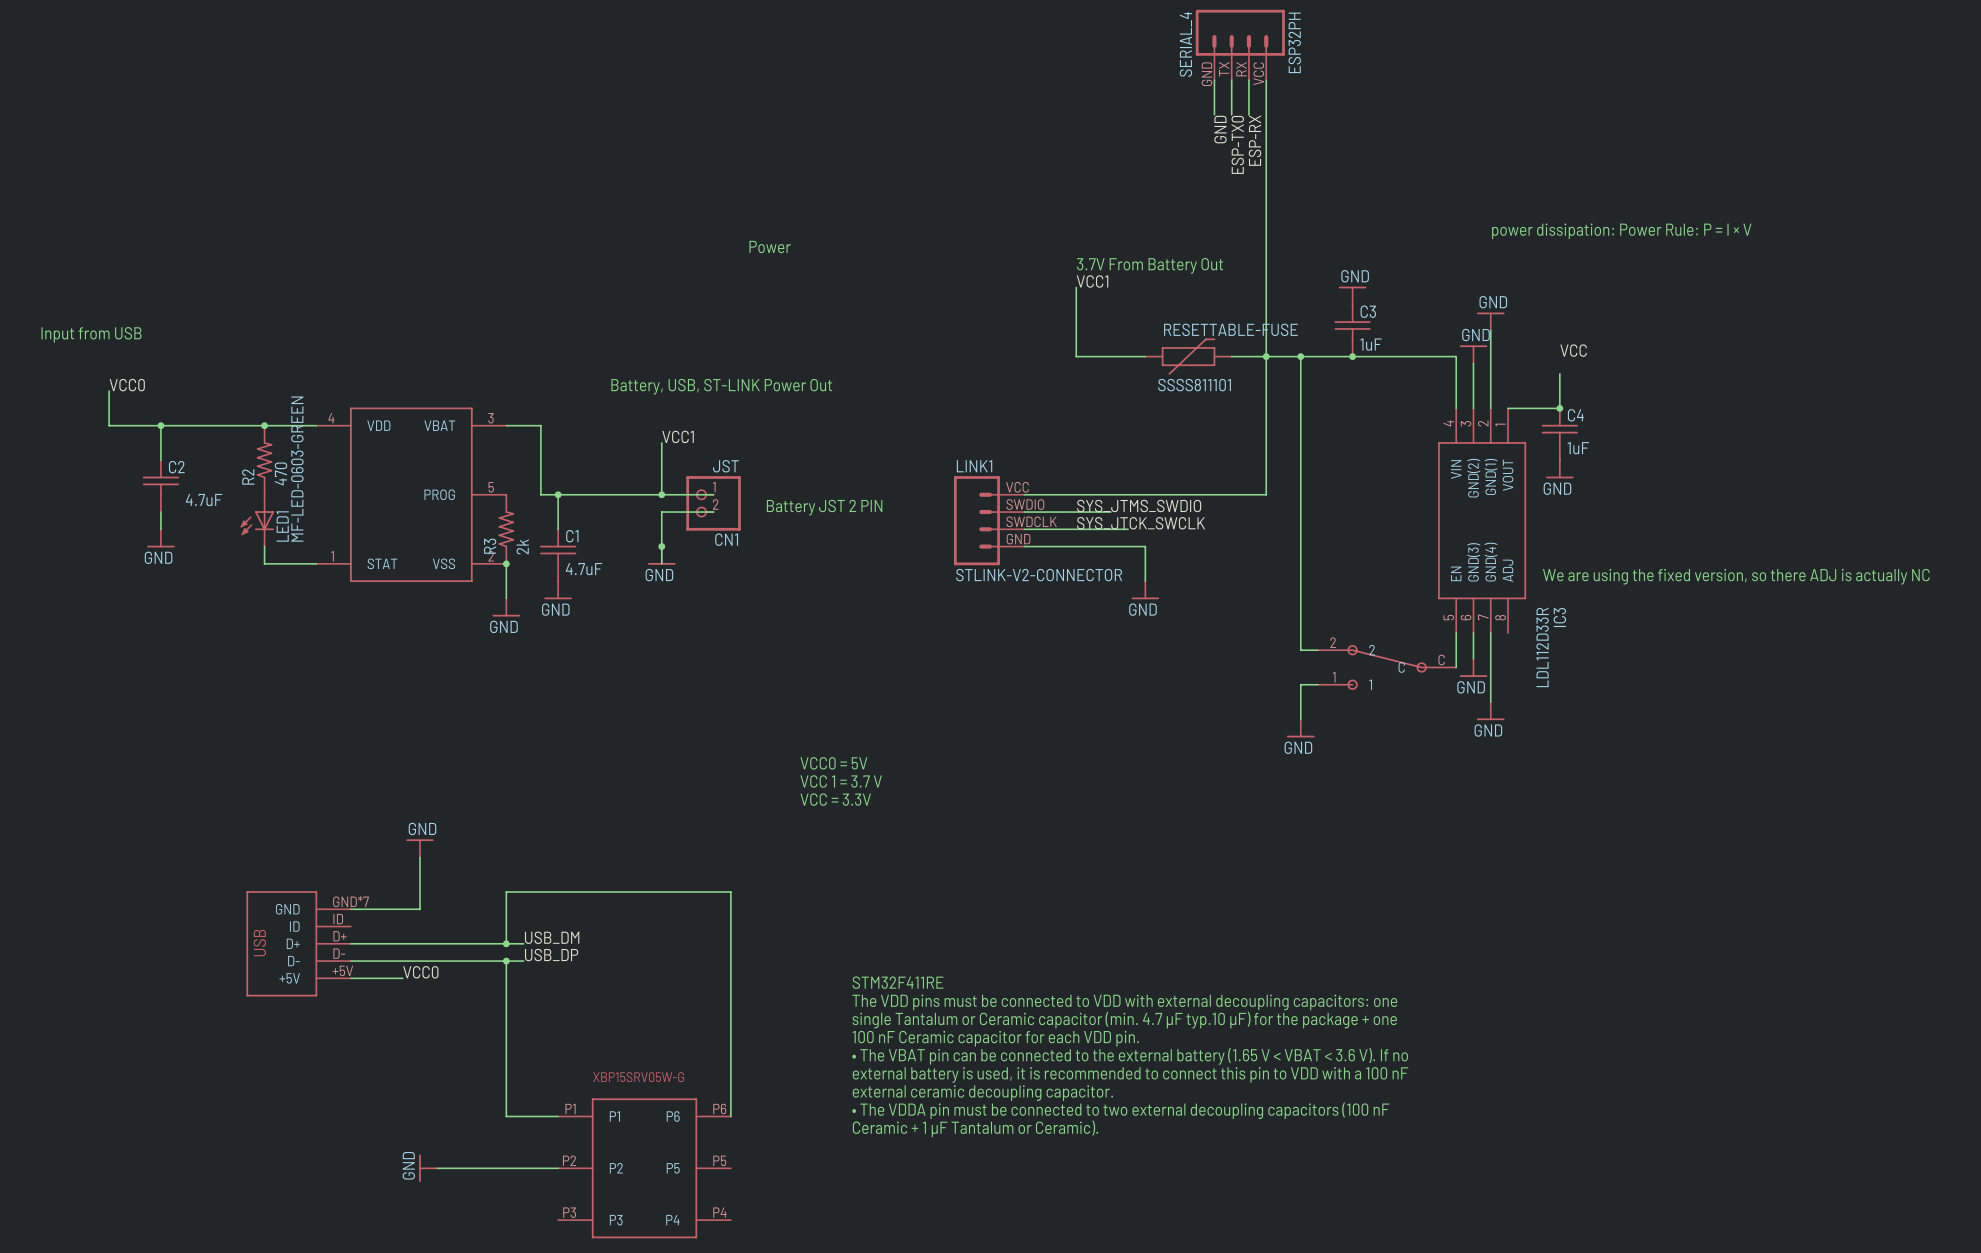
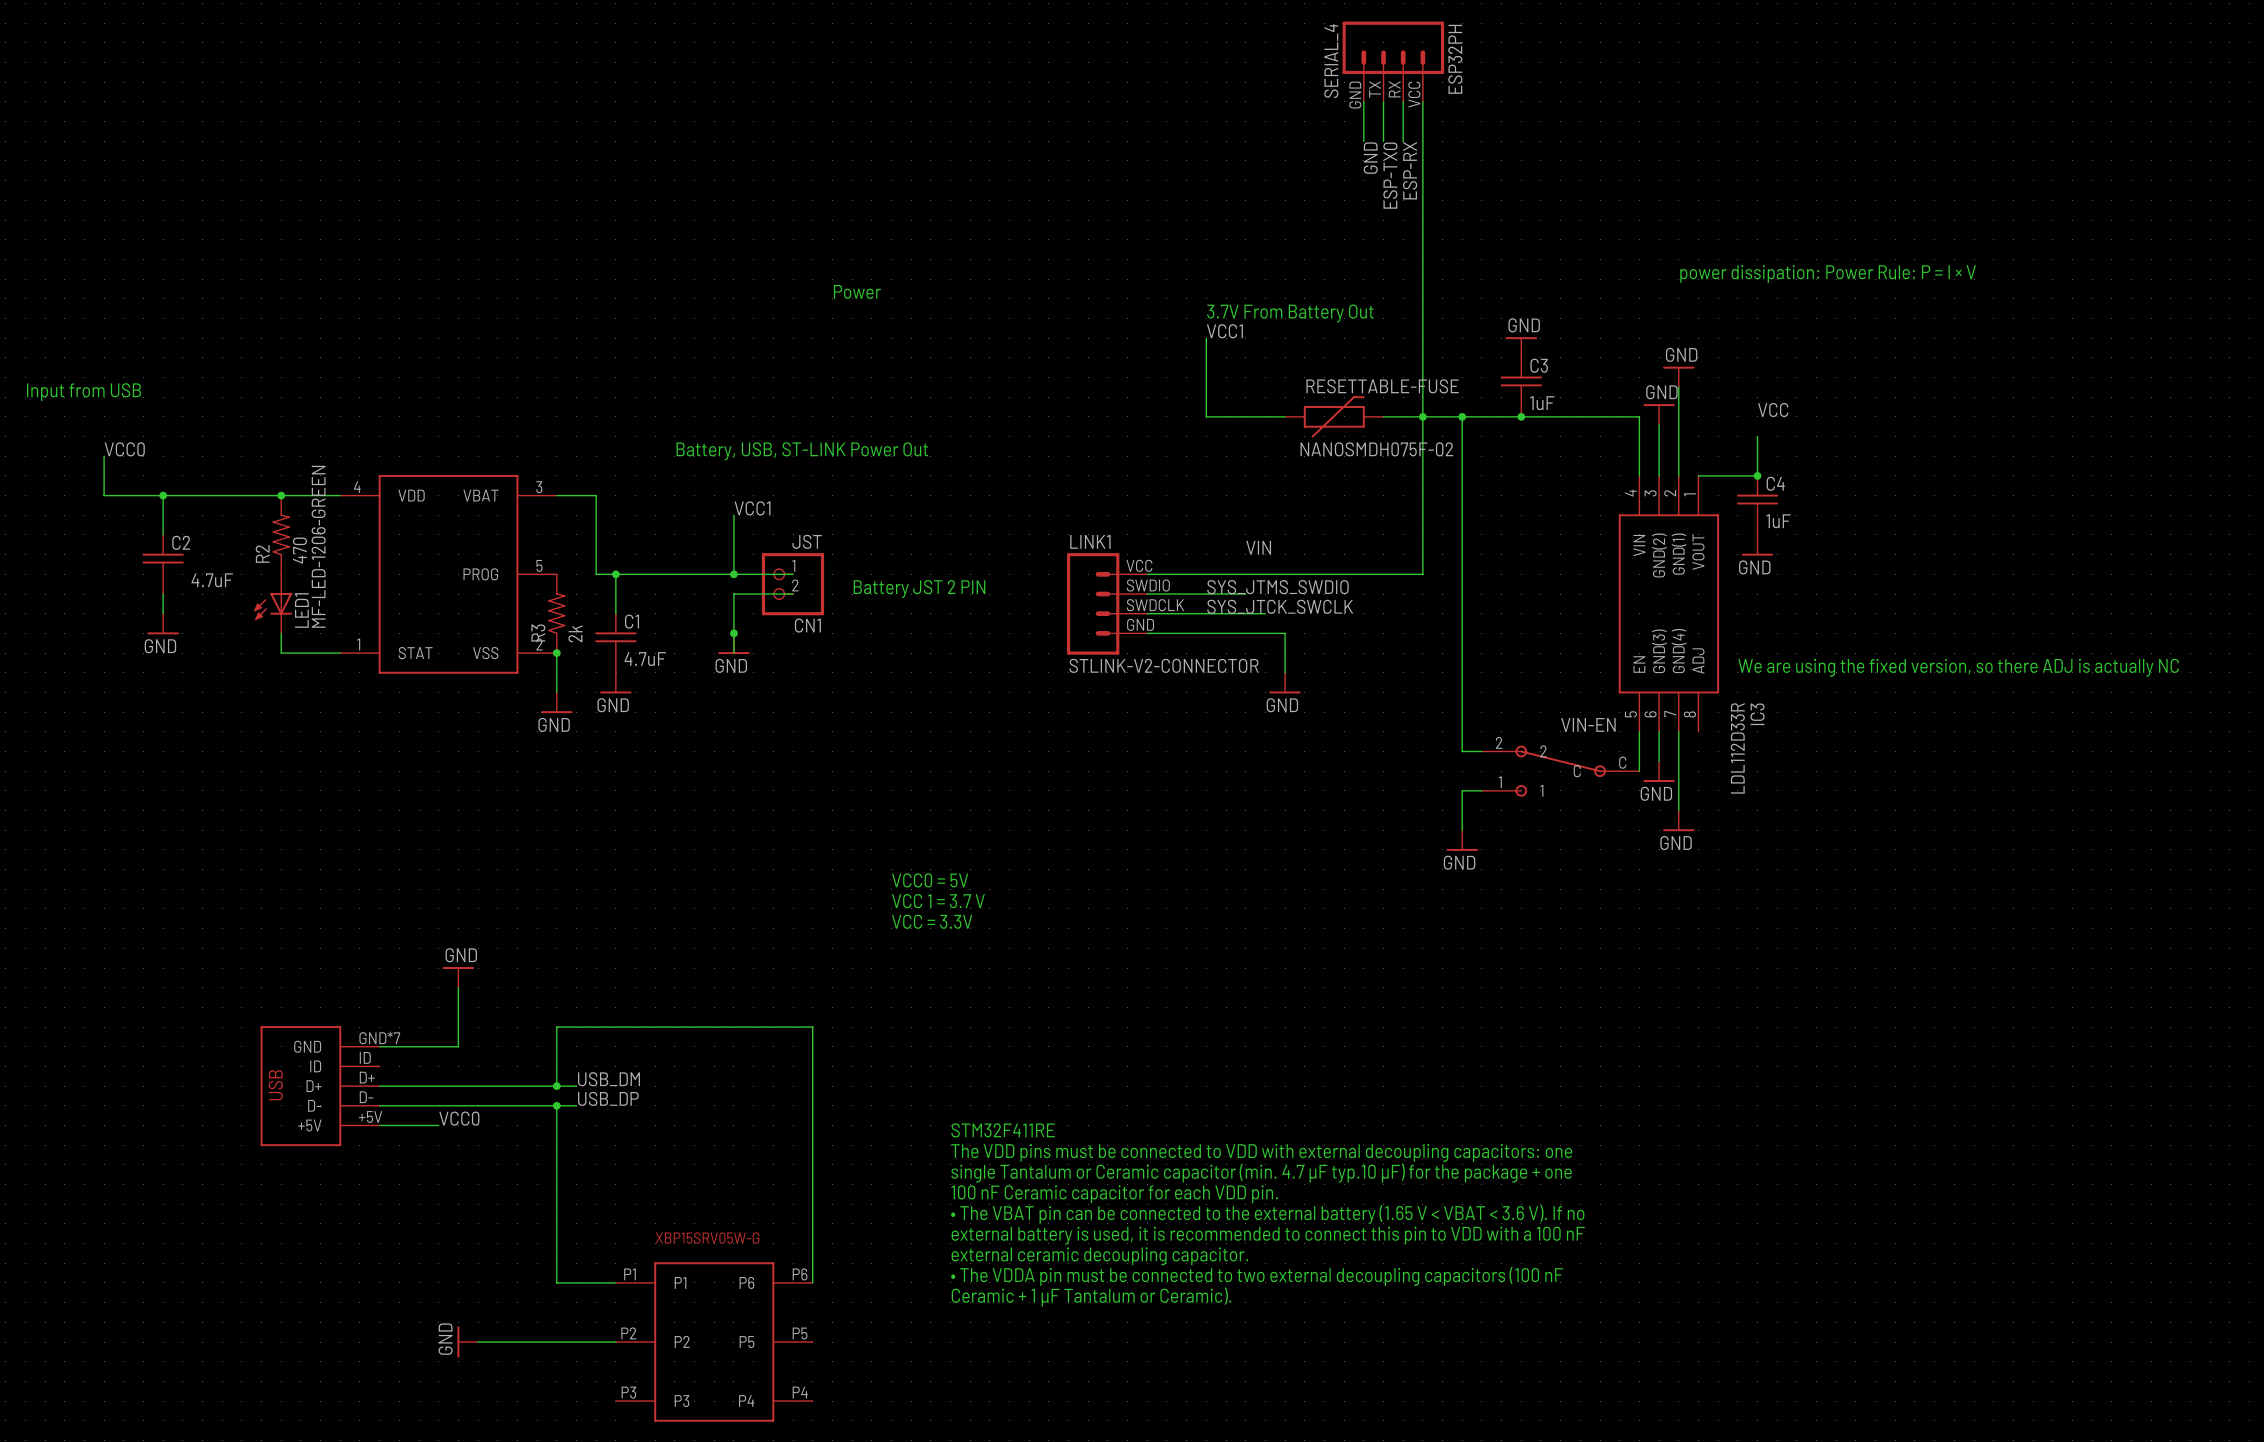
RESETTABLE-FUSE value: SSSS811101 (1194, 385) -> NANOSMDH075F-02 (1376, 449)
LED1 value: MF-LED-0603-GREEN (297, 469) -> MF-LED-1206-GREEN (318, 546)
label: none -> VIN (1258, 547)
label: none -> VIN-EN (1588, 724)

